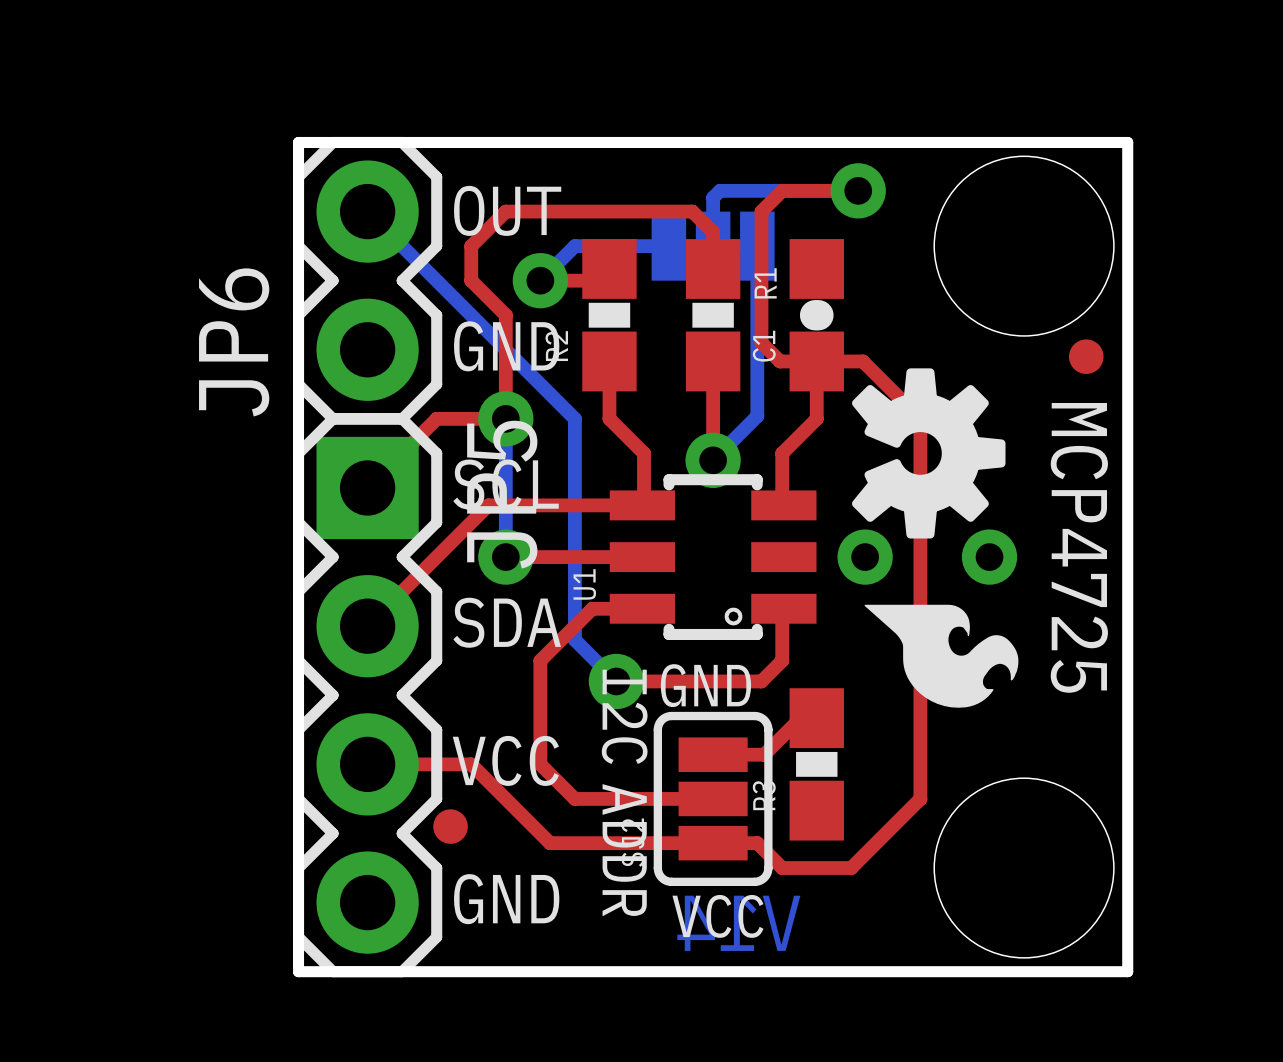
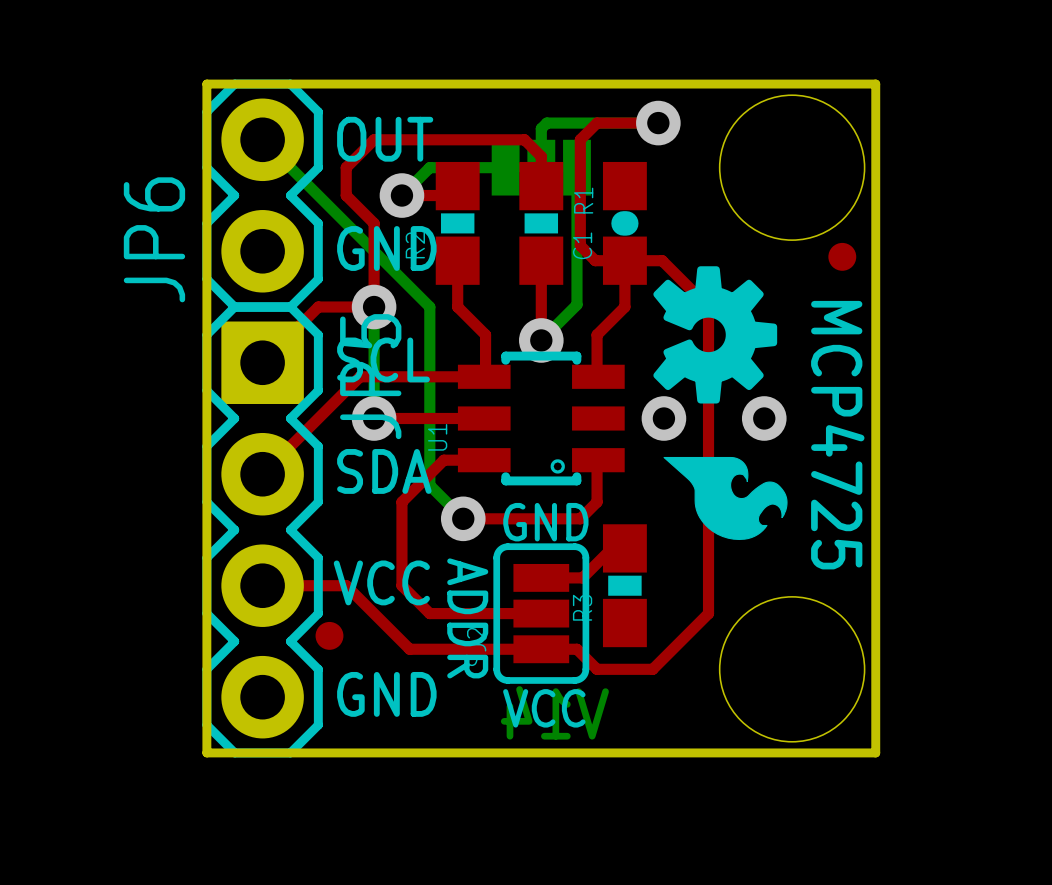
text: I2C (624, 716) -> none
text position: ADDR (624, 850) -> ADDR (467, 618)

